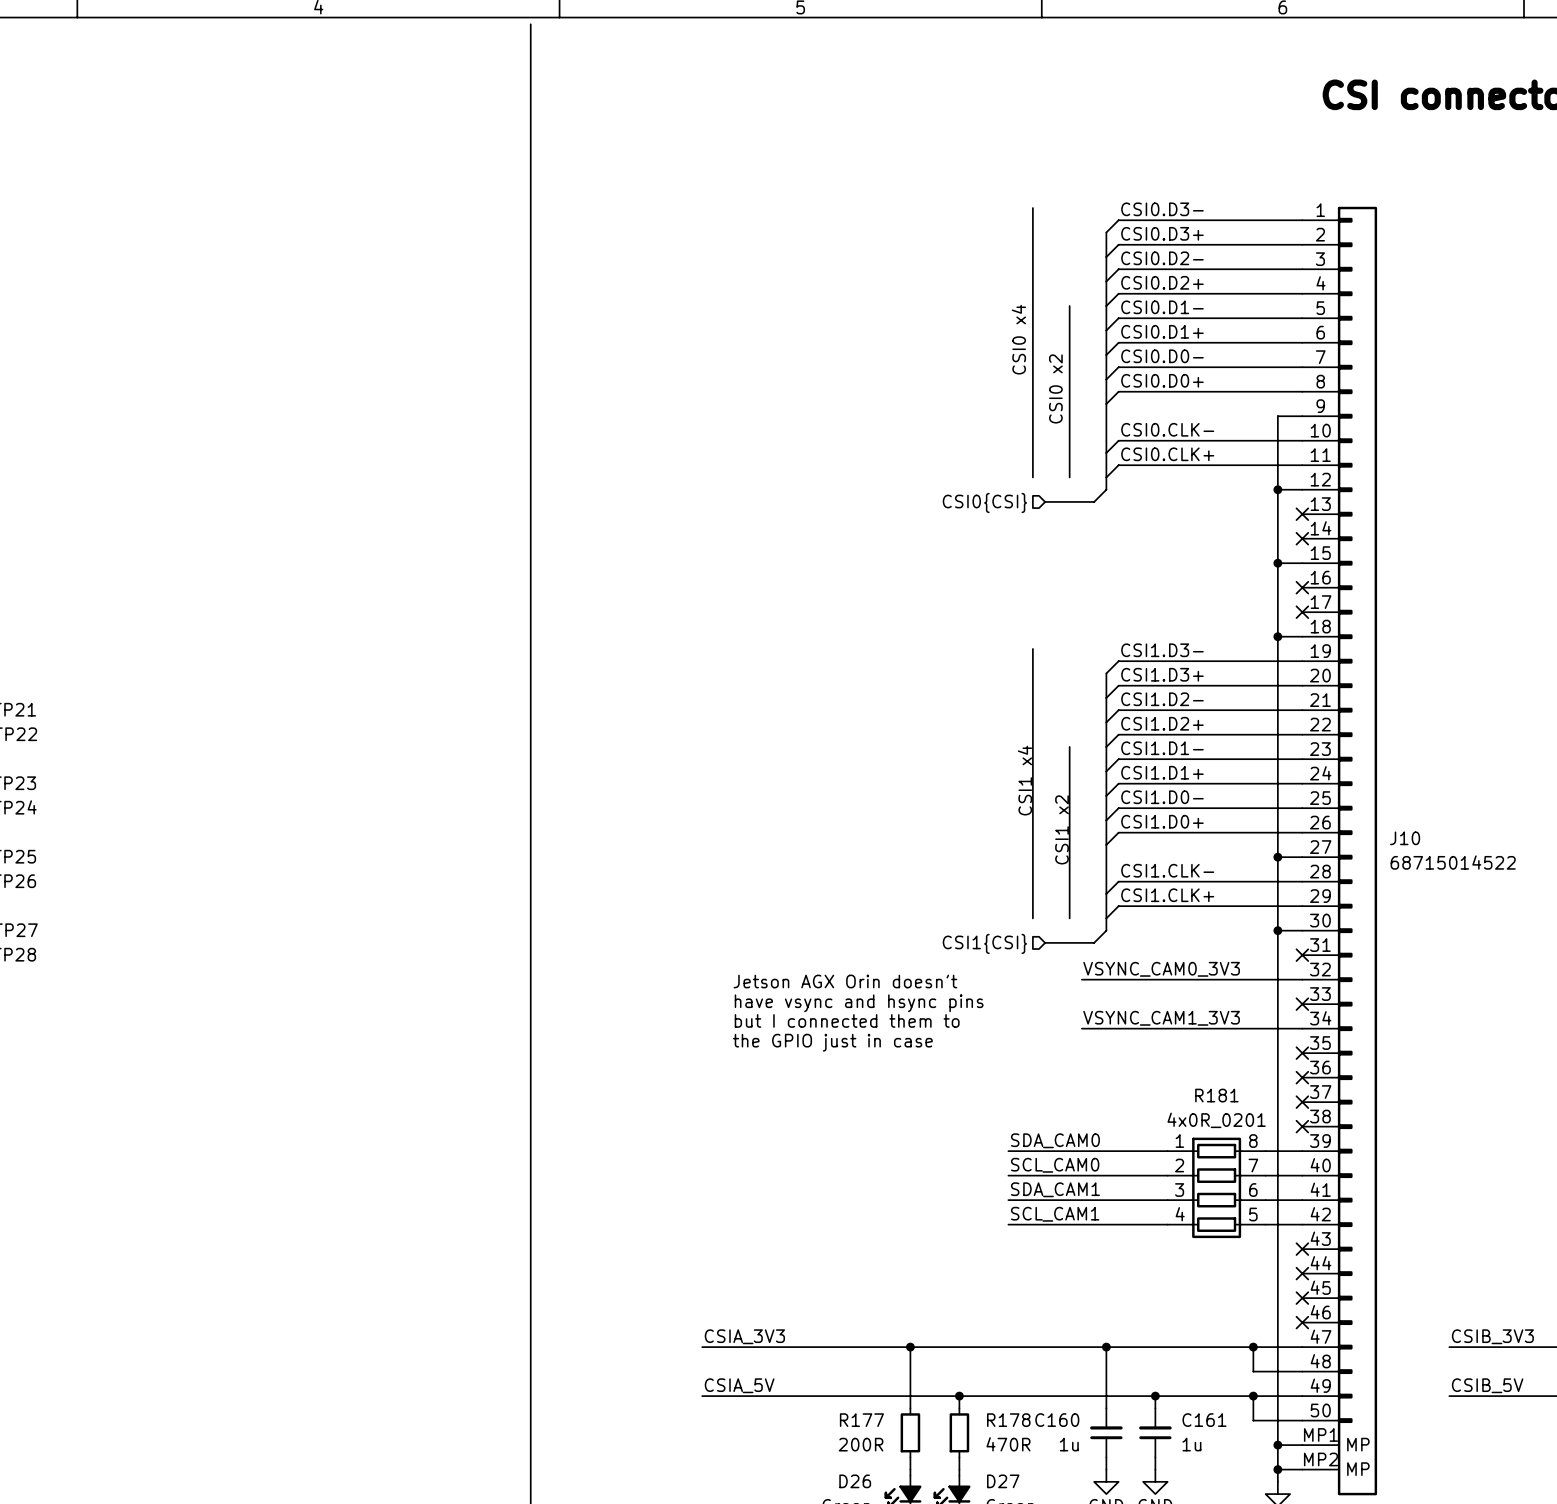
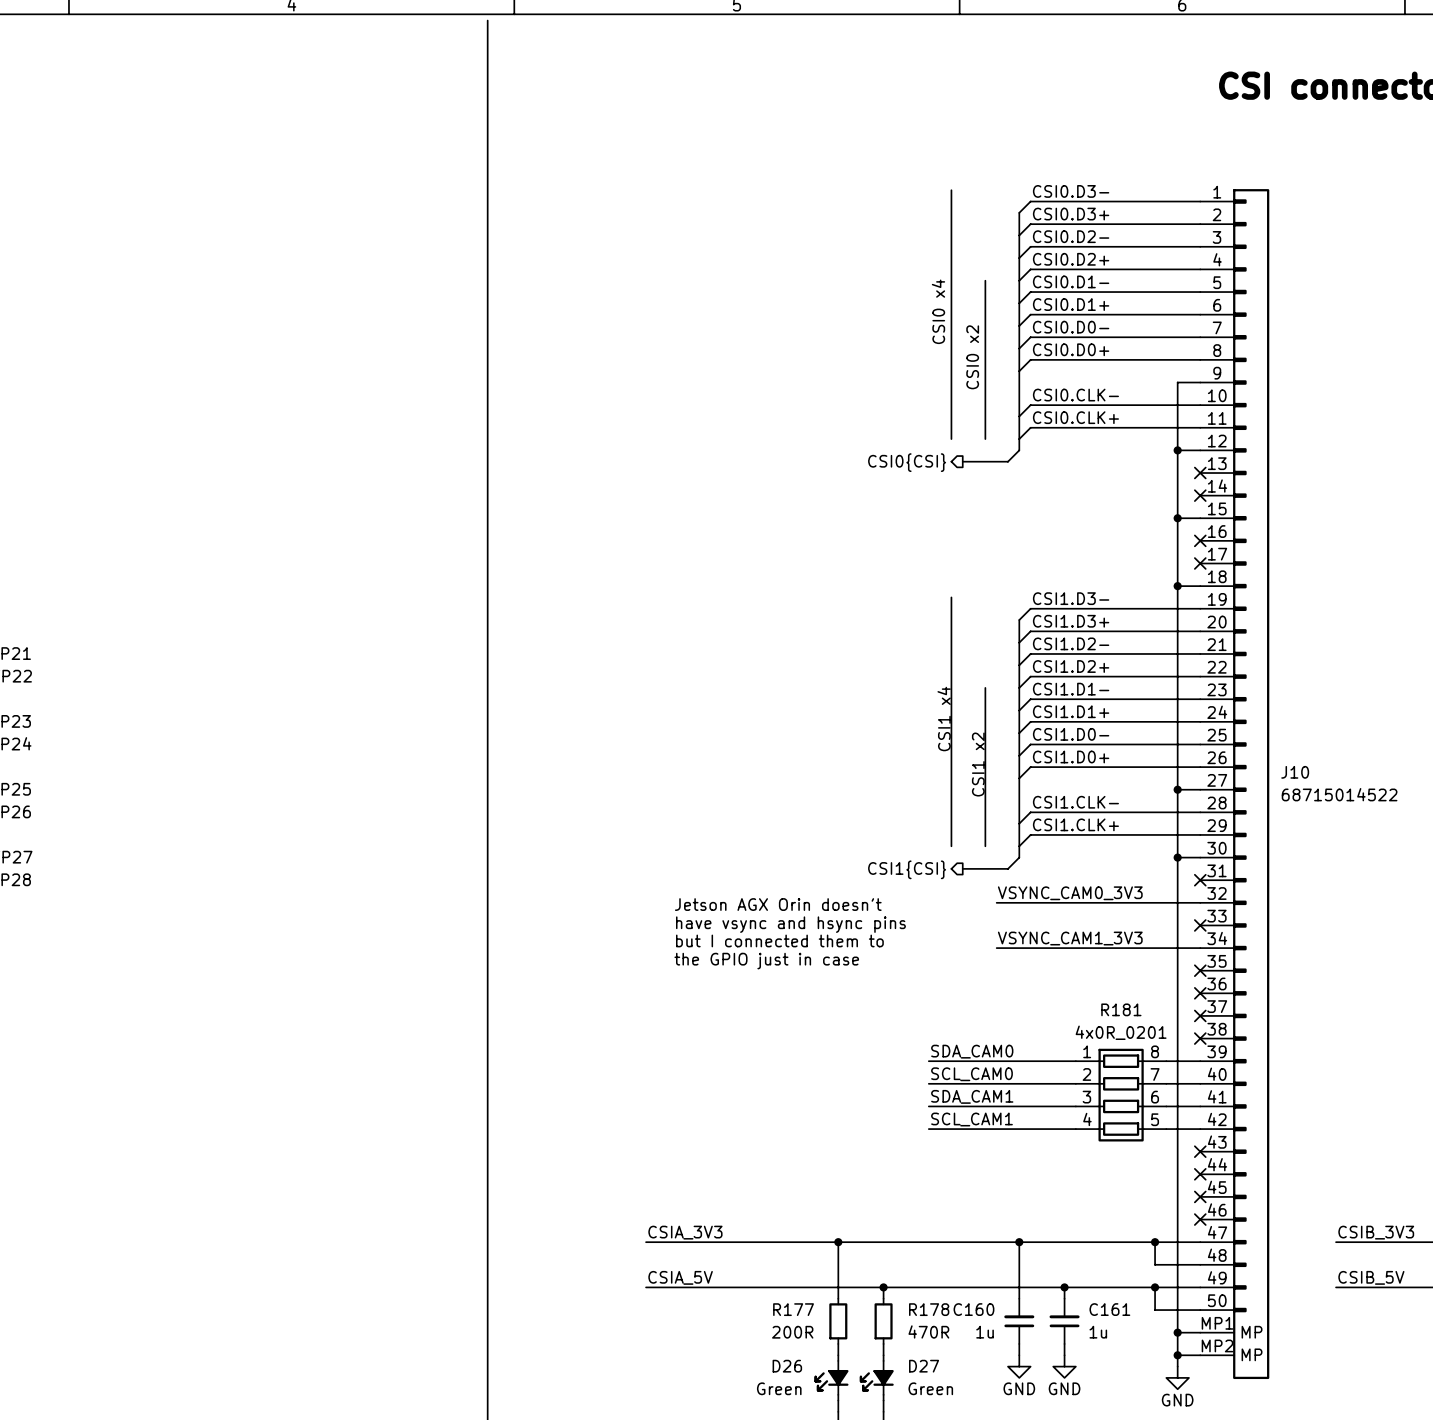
hierarchical label shape: input (984, 502) -> output (907, 462)
hierarchical label shape: input (984, 943) -> output (907, 869)

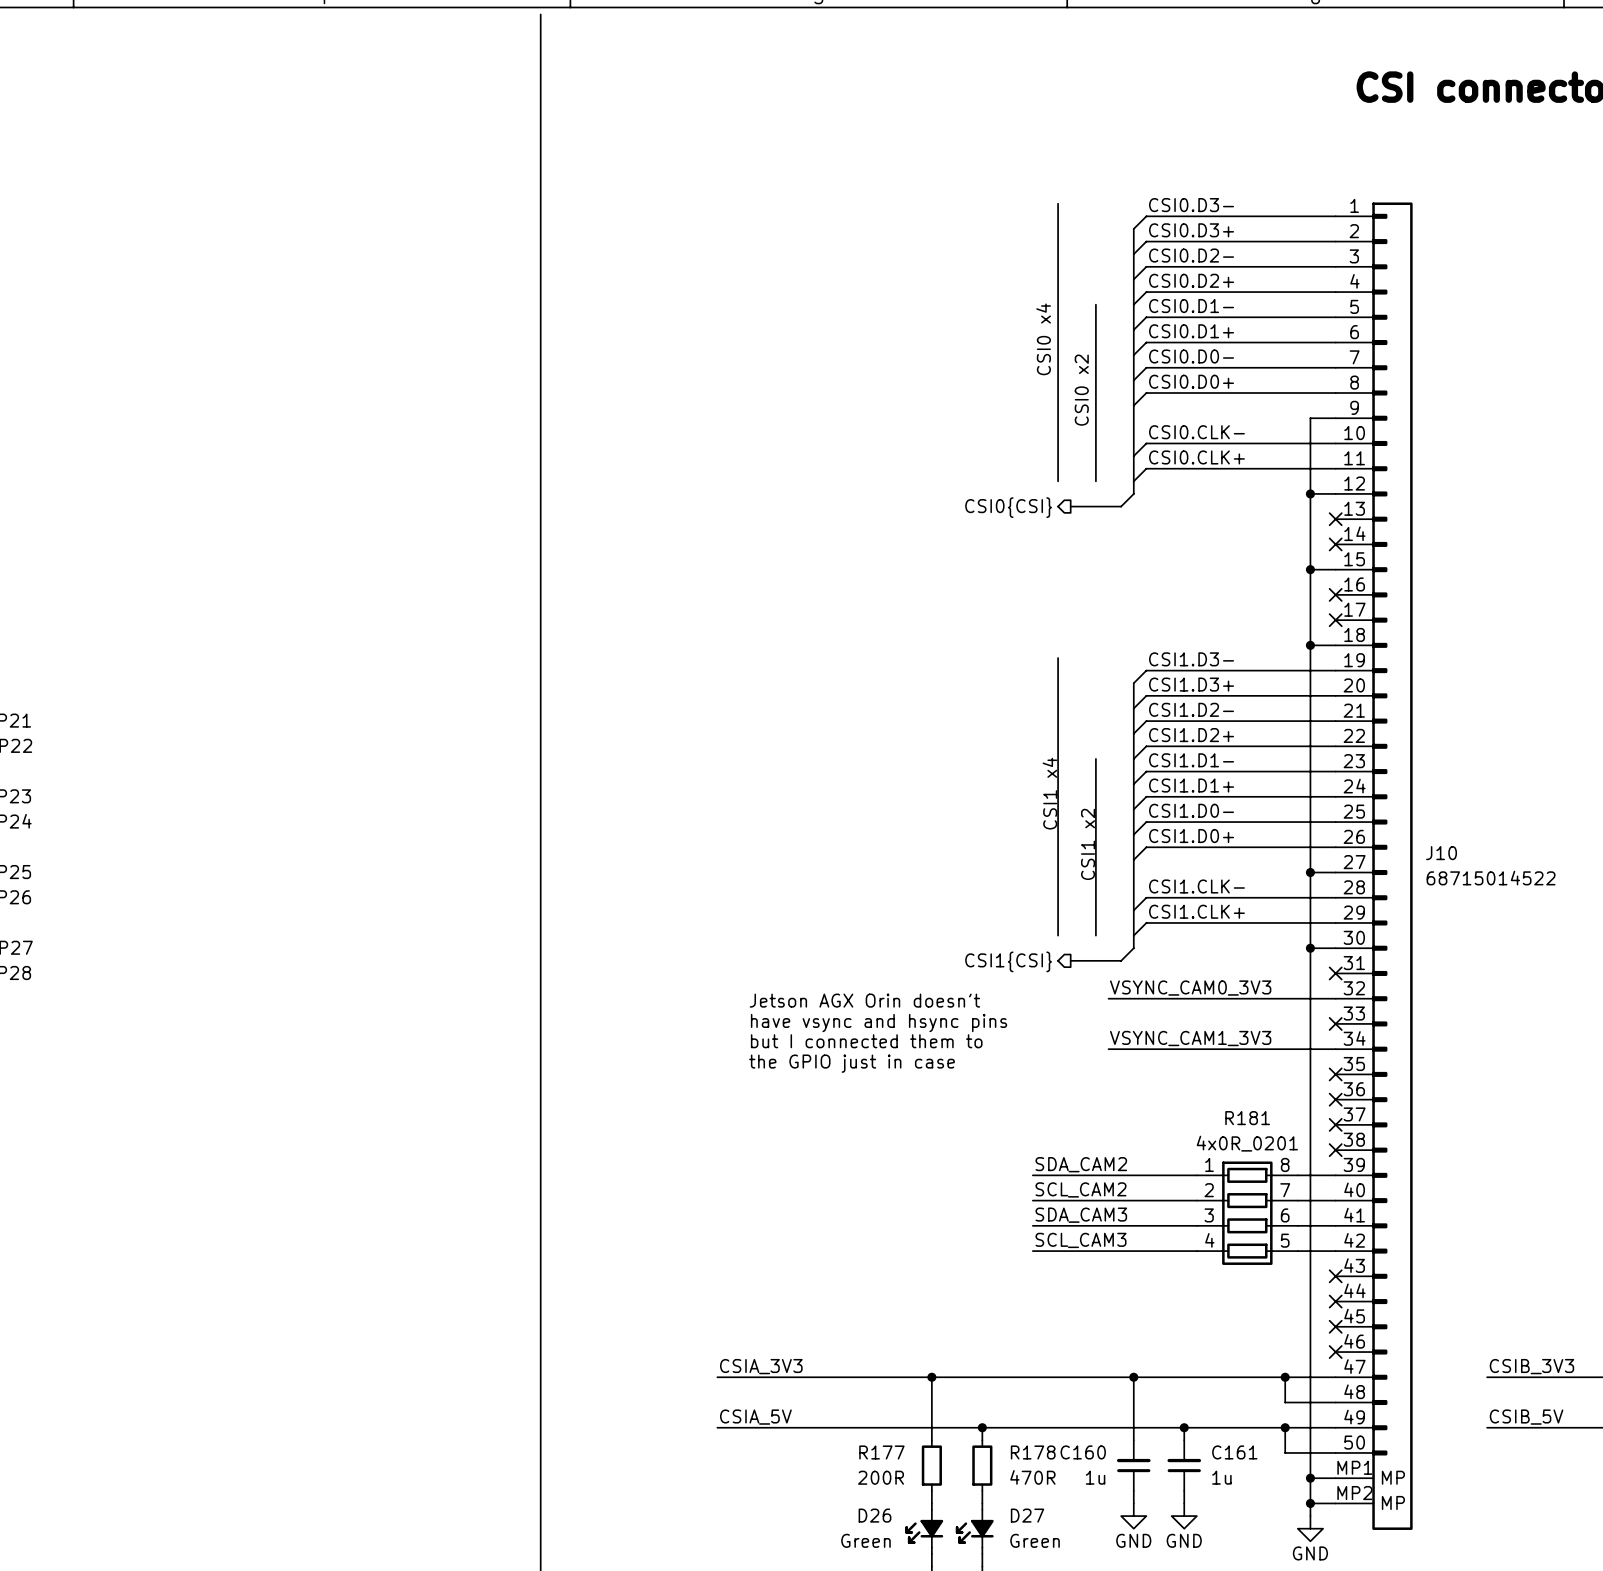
label: SDA_CAM0 (972, 1051) -> SDA_CAM2 (1081, 1164)
label: SCL_CAM0 (971, 1074) -> SCL_CAM2 (1080, 1189)
label: SDA_CAM1 (972, 1096) -> SDA_CAM3 (1081, 1215)
label: SCL_CAM1 (971, 1119) -> SCL_CAM3 (1080, 1240)

